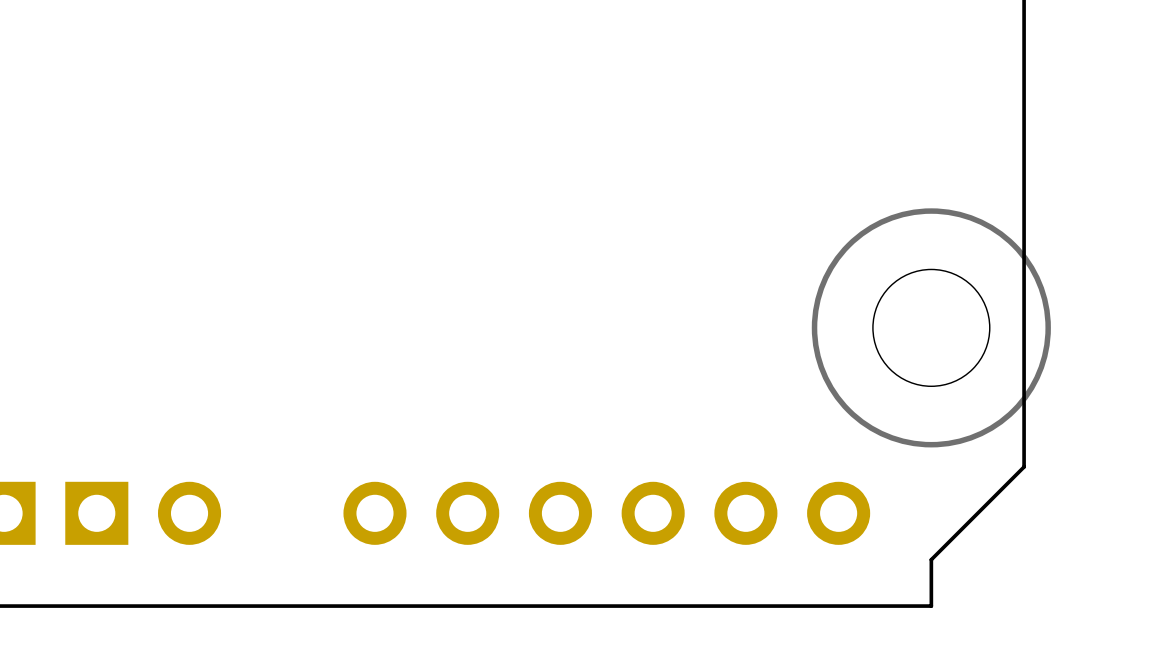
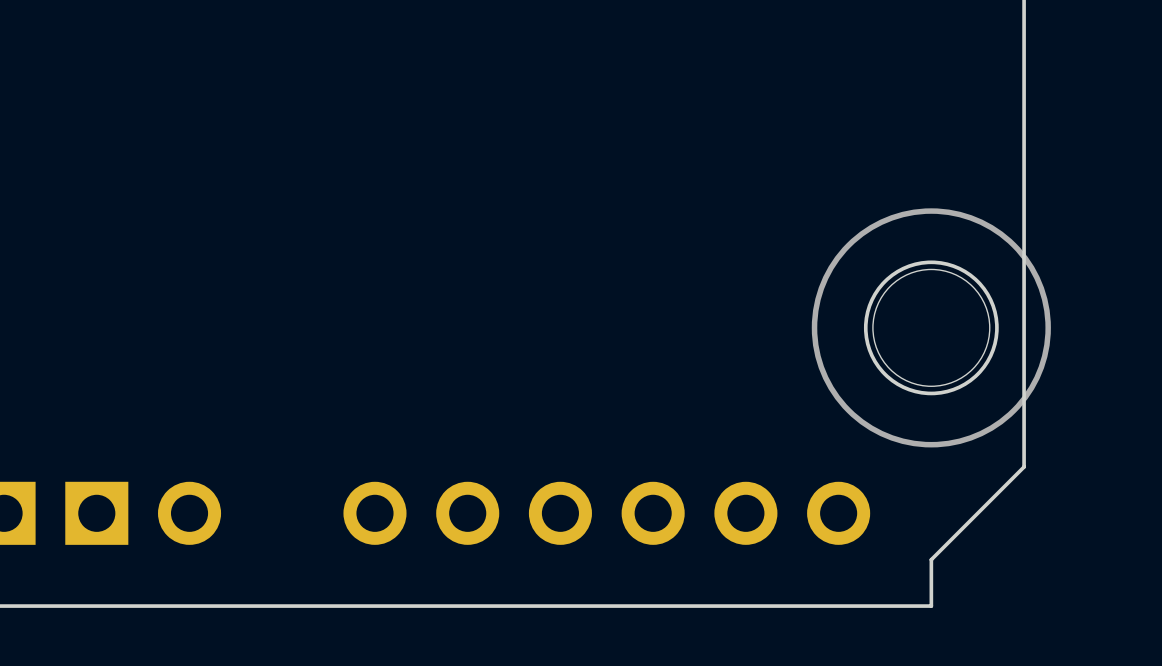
round board edge: none -> [863, 260, 999, 396]

